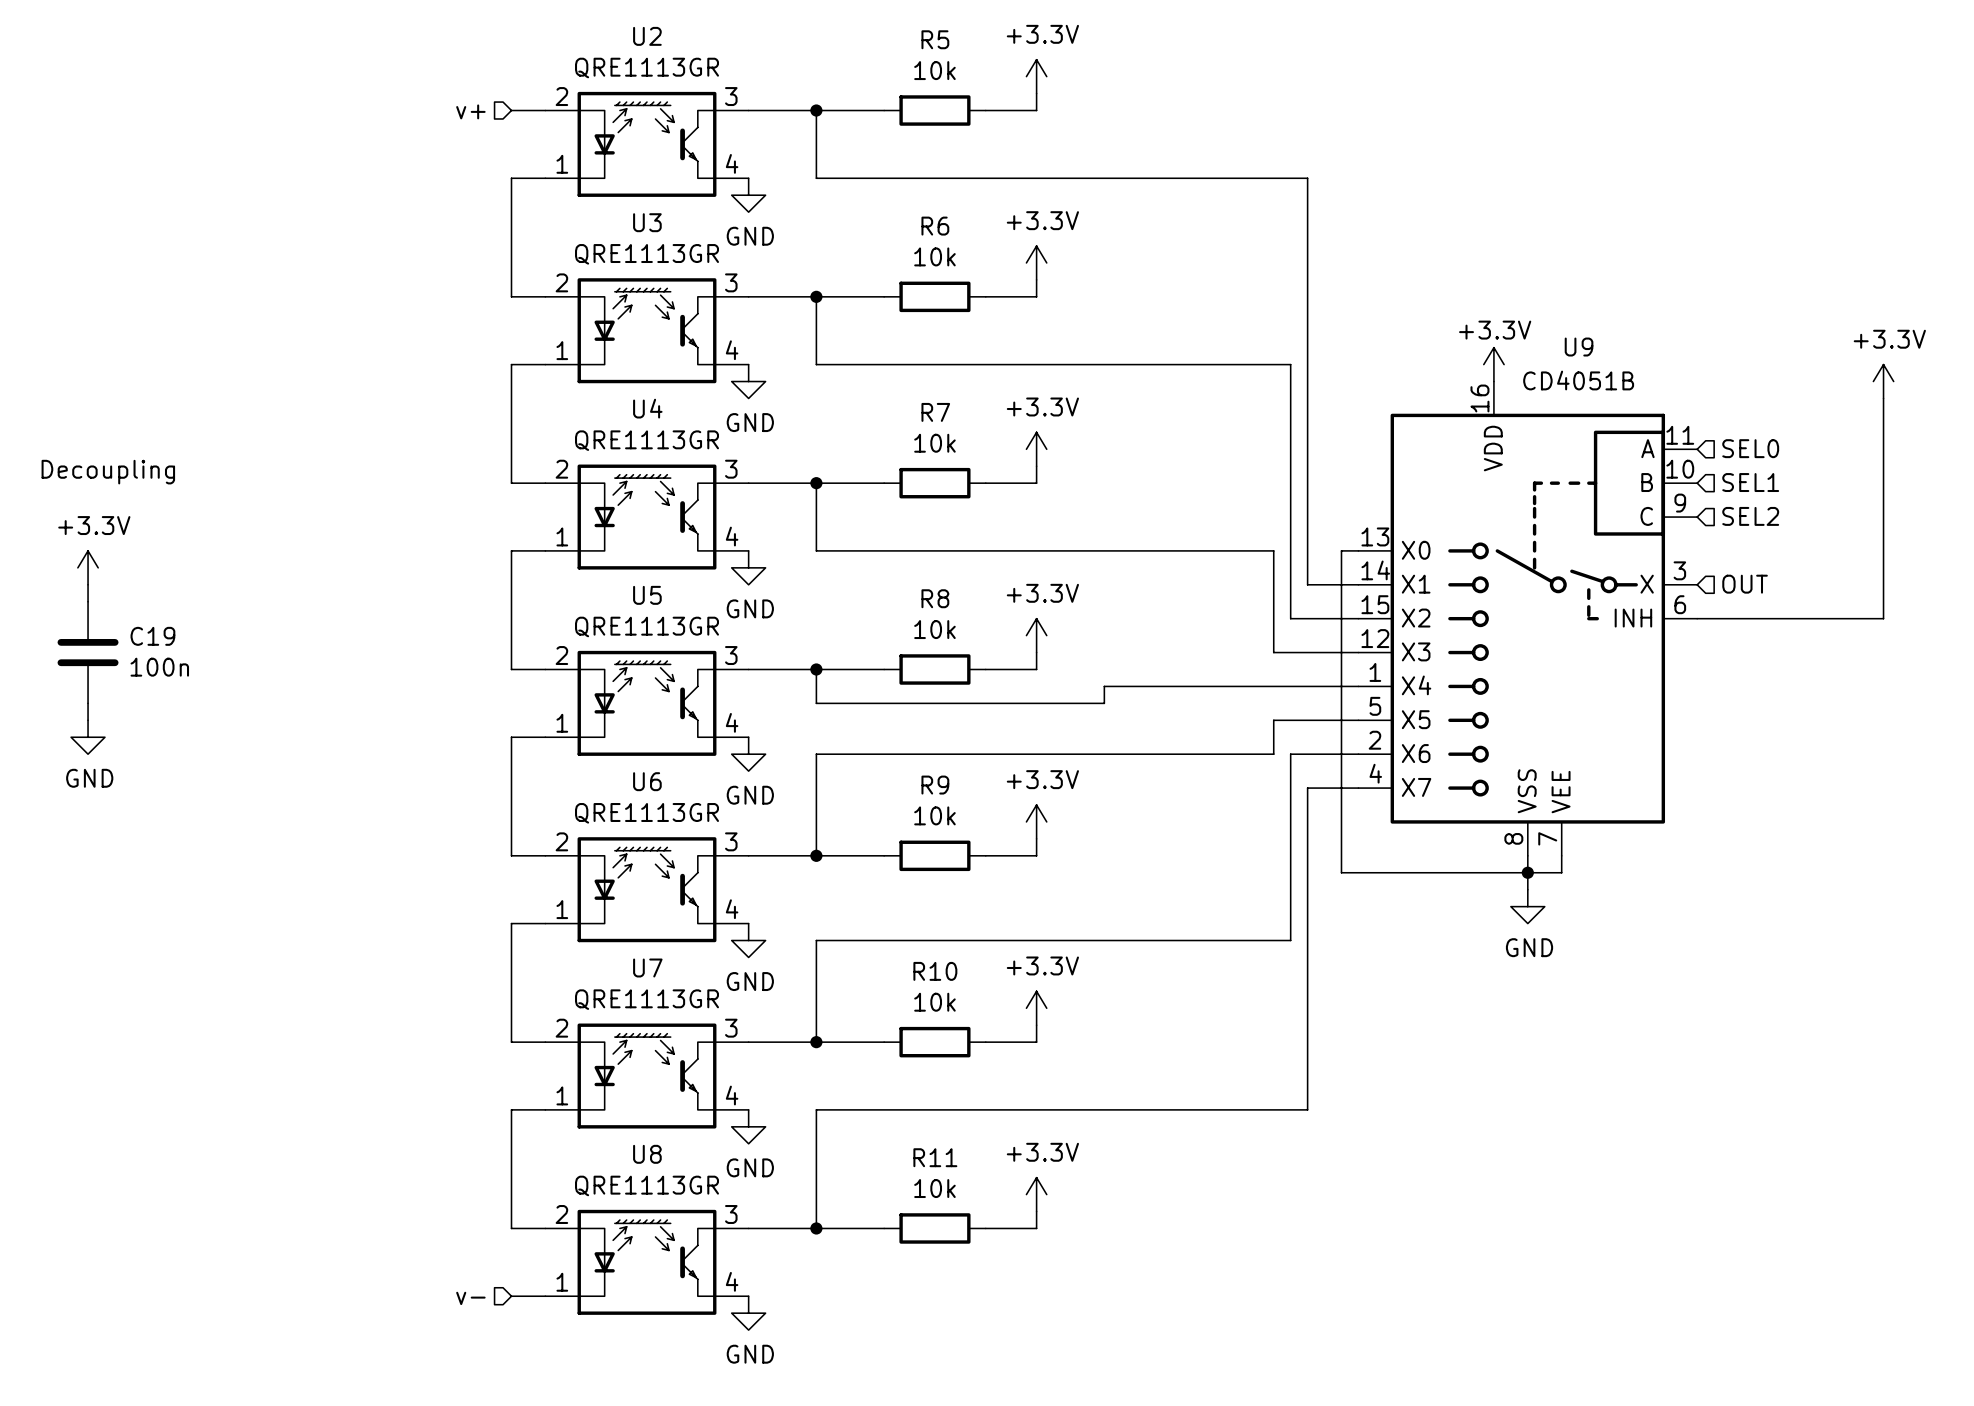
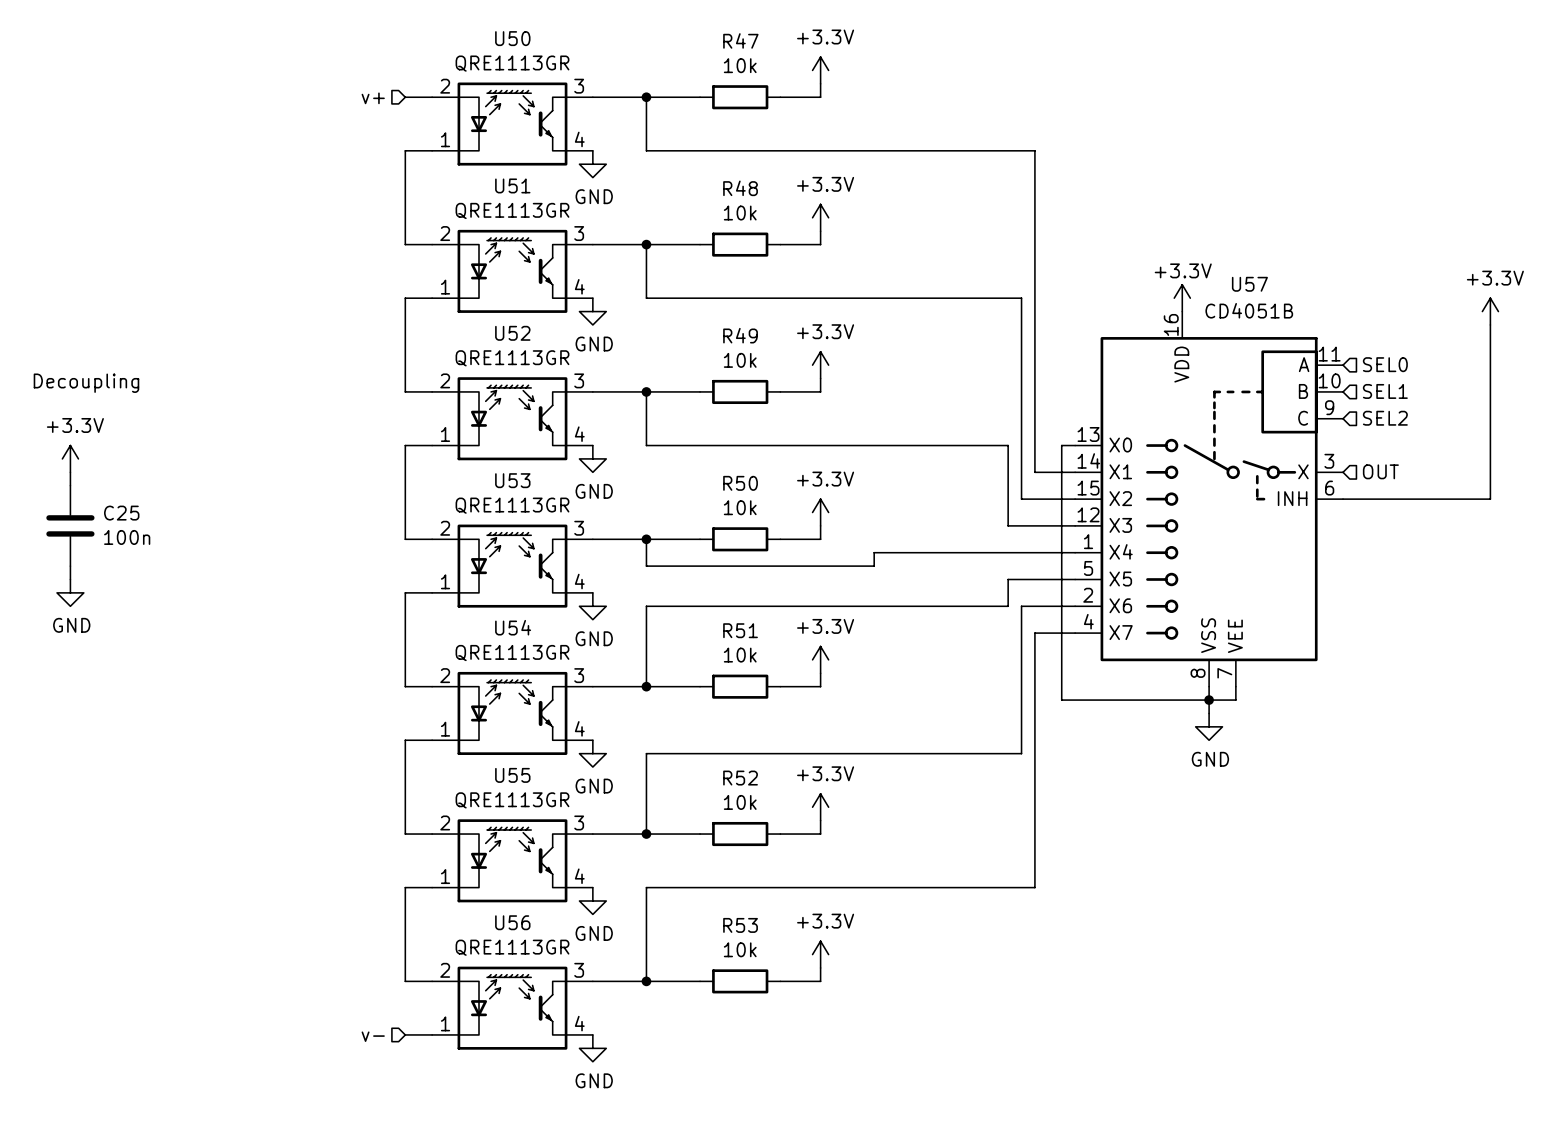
U2 name: U2 (647, 36) -> U50 (512, 38)
R5 name: R5 (935, 39) -> R47 (740, 40)
U3 name: U3 (647, 222) -> U51 (512, 185)
R6 name: R6 (935, 226) -> R48 (740, 188)
U9 name: U9 (1579, 347) -> U57 (1249, 284)
U4 name: U4 (647, 408) -> U52 (512, 333)
R7 name: R7 (935, 412) -> R49 (740, 335)
U5 name: U5 (647, 595) -> U53 (512, 480)
R8 name: R8 (935, 598) -> R50 (740, 483)
C19 name: C19 (152, 636) -> C25 (121, 513)
U6 name: U6 (647, 781) -> U54 (513, 627)
R9 name: R9 (935, 785) -> R51 (740, 630)
U7 name: U7 (647, 968) -> U55 (512, 775)
R10 name: R10 (935, 971) -> R52 (740, 778)
U8 name: U8 (647, 1154) -> U56 (512, 922)
R11 name: R11 (935, 1157) -> R53 (740, 925)

